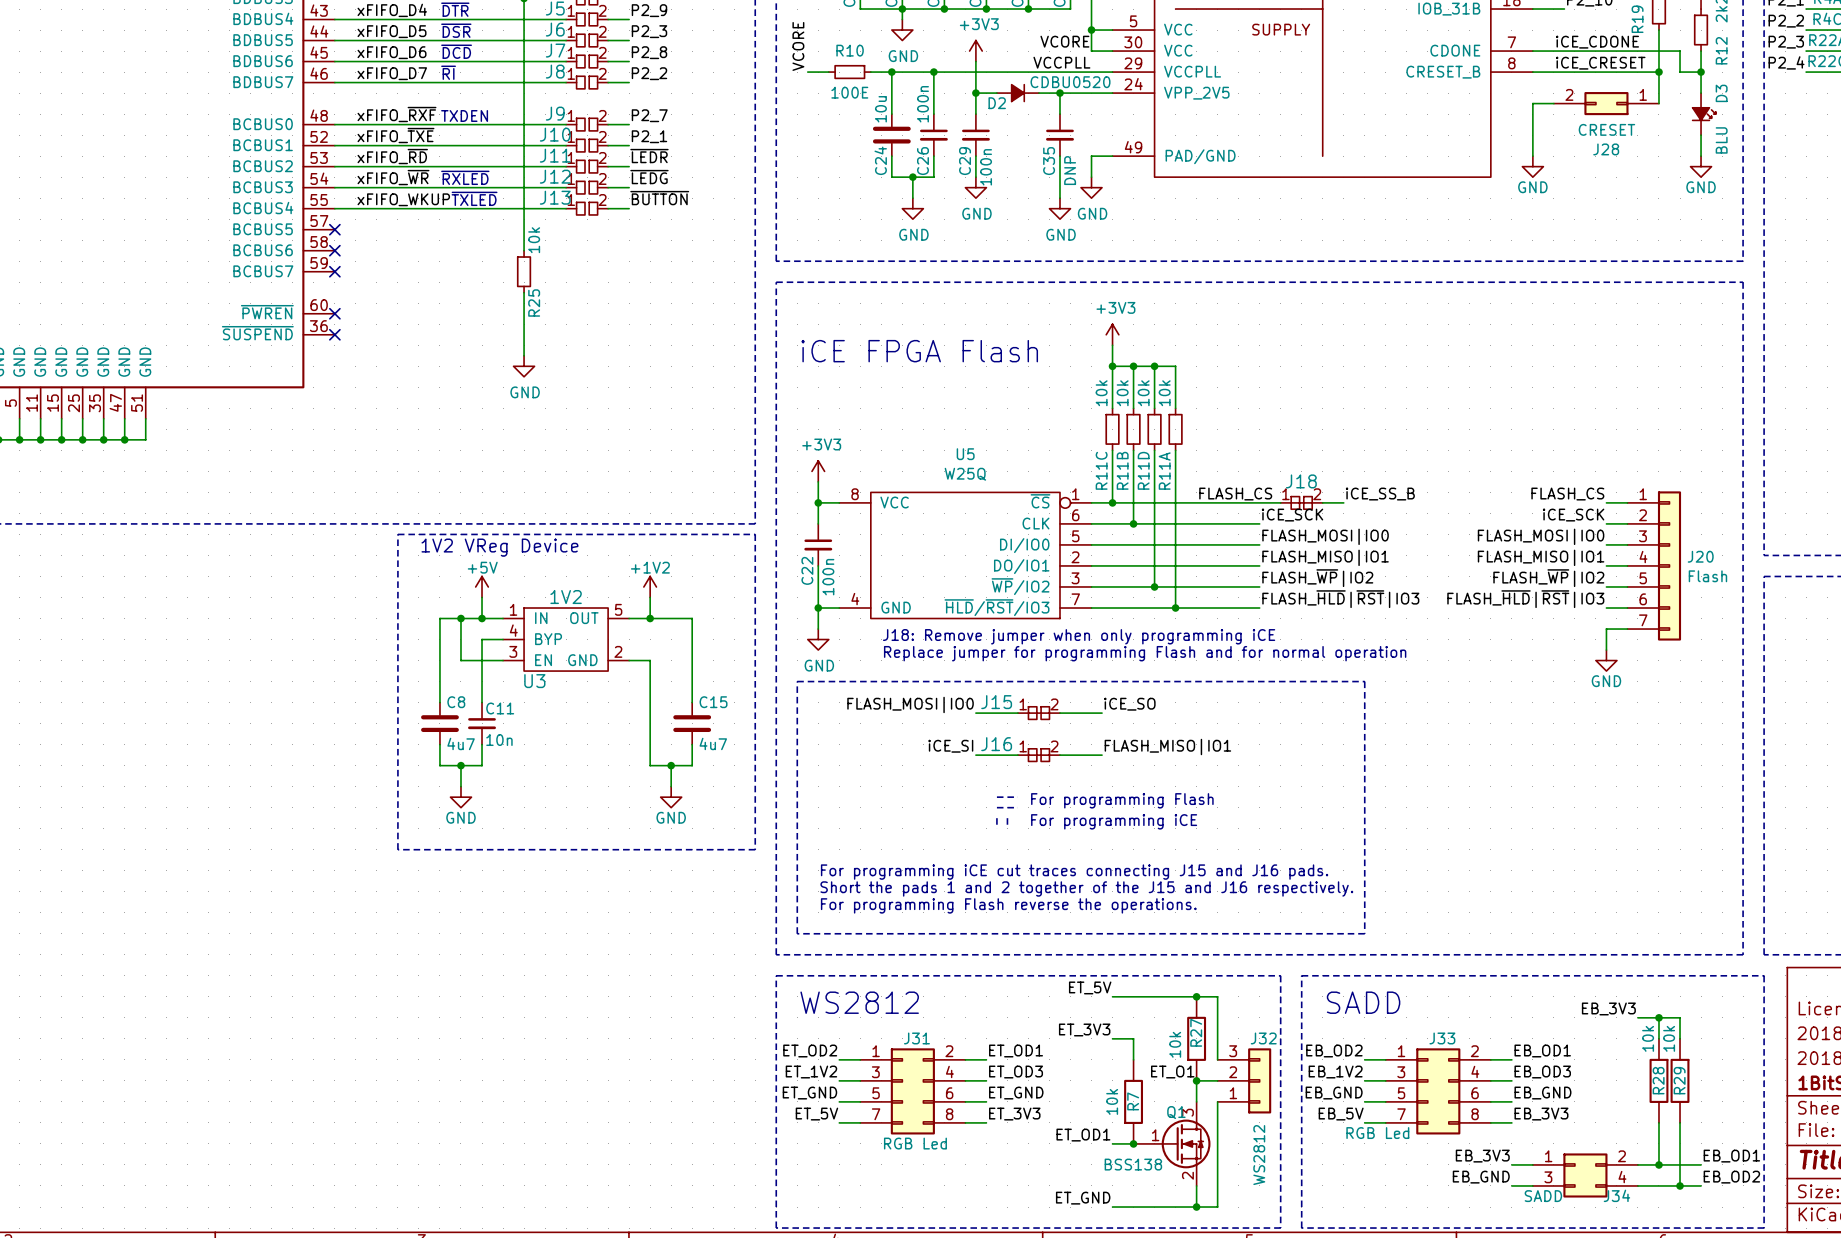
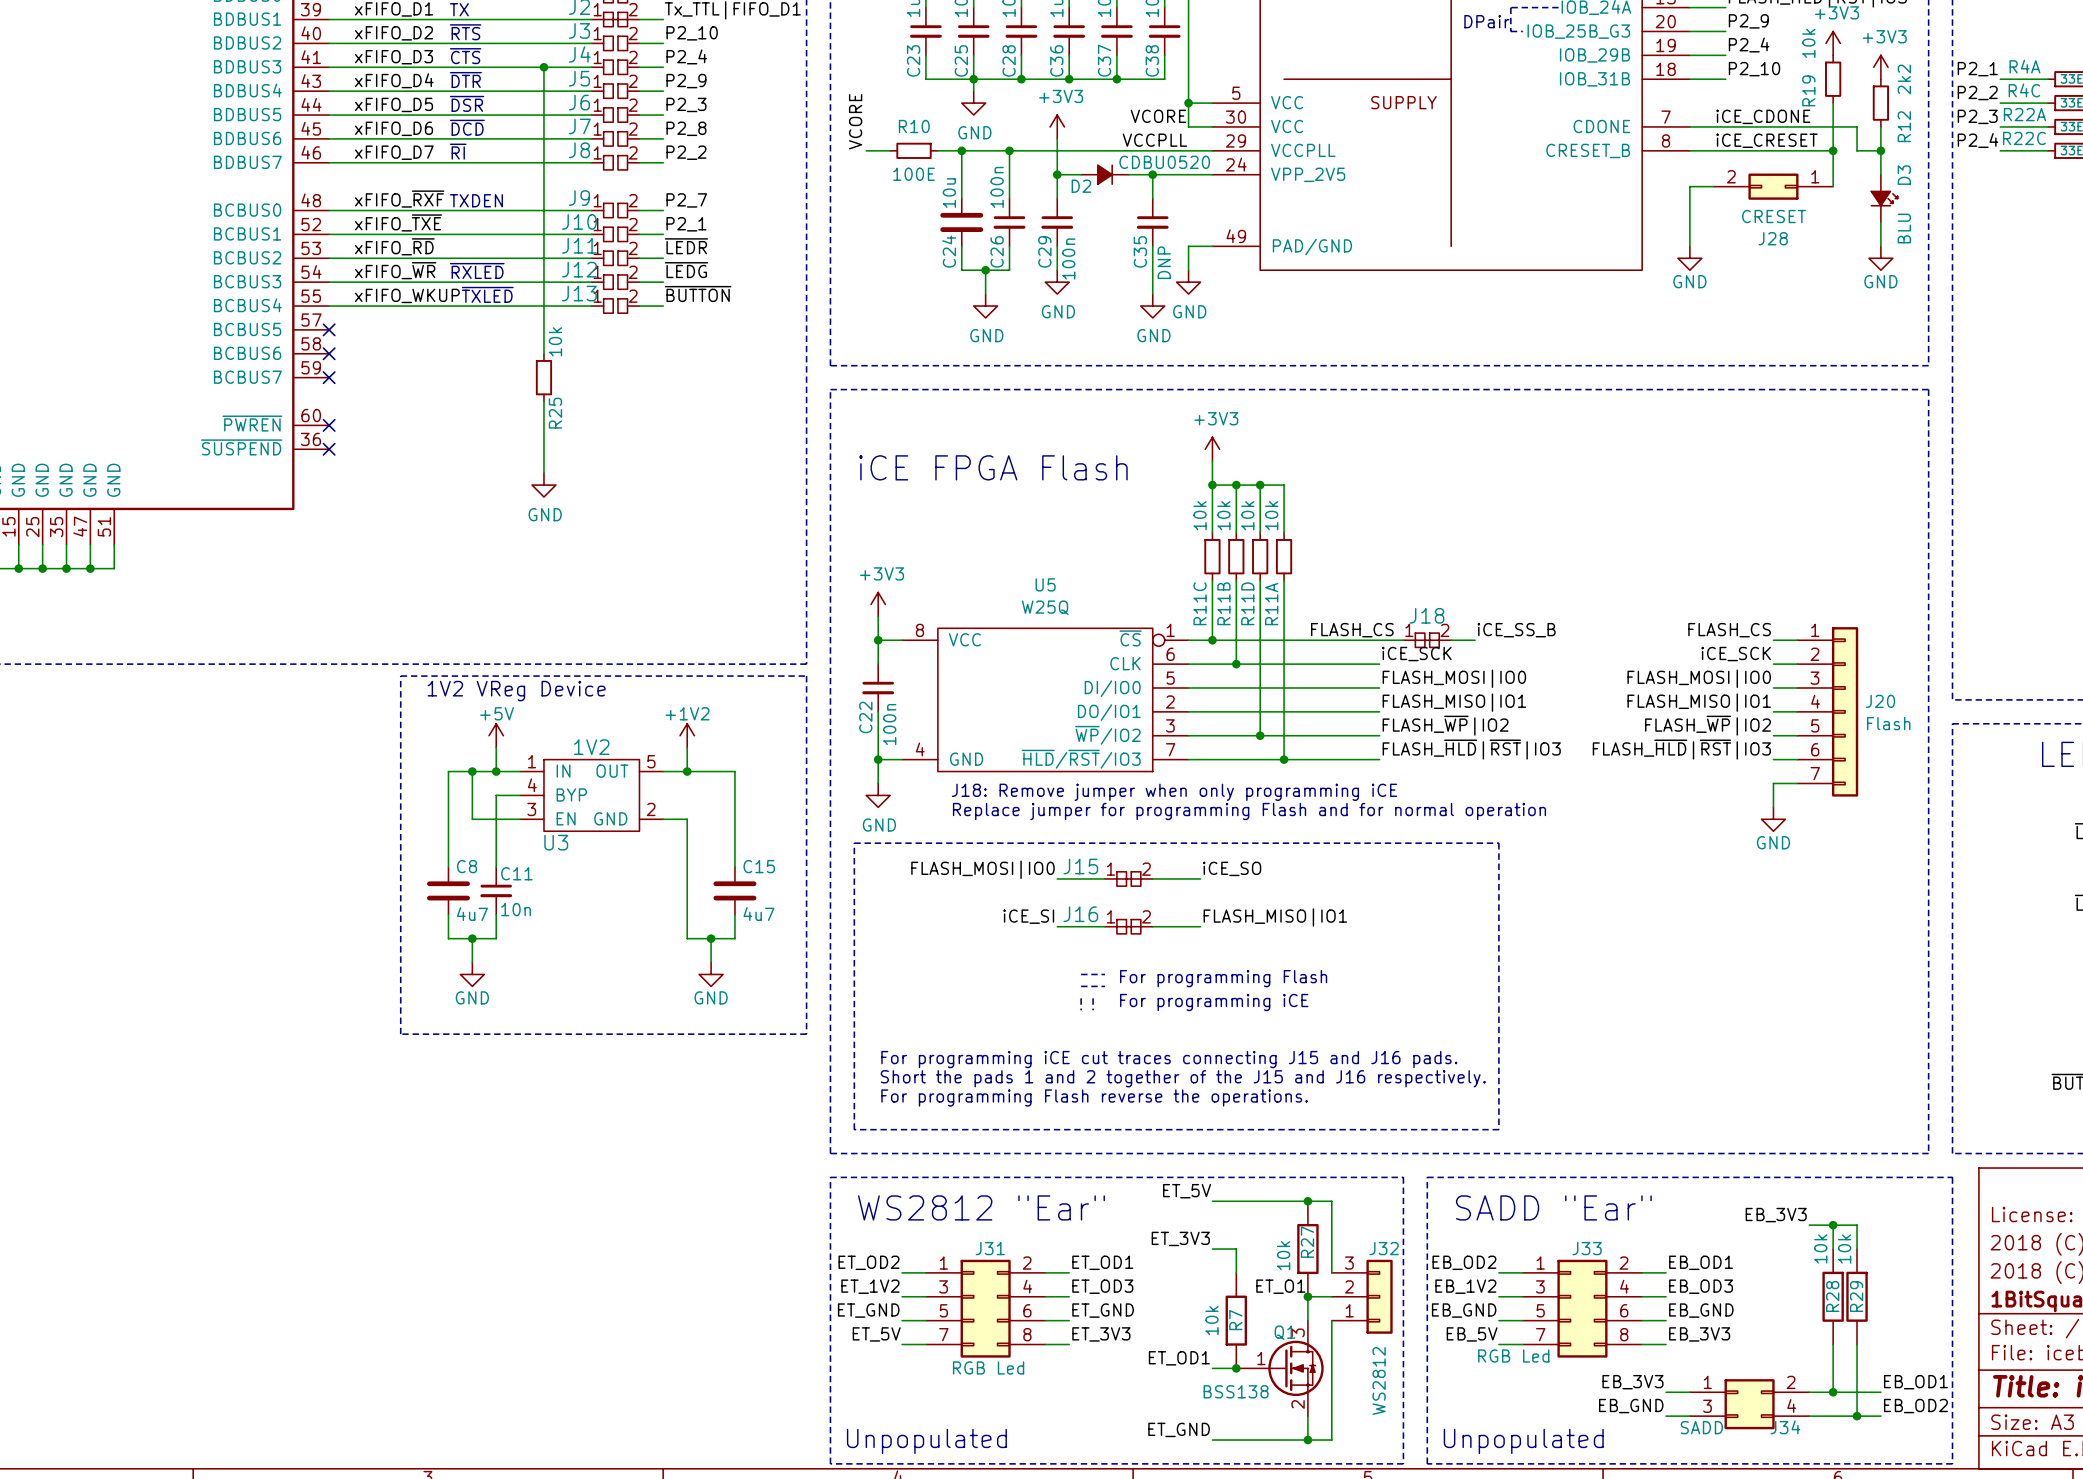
text: WS2812 (859, 1002) -> WS2812 "Ear" (981, 1207)
text: SADD (1363, 1002) -> SADD "Ear" (1553, 1207)
text: none -> Unpopulated (926, 1441)
text: none -> Unpopulated (1523, 1441)

